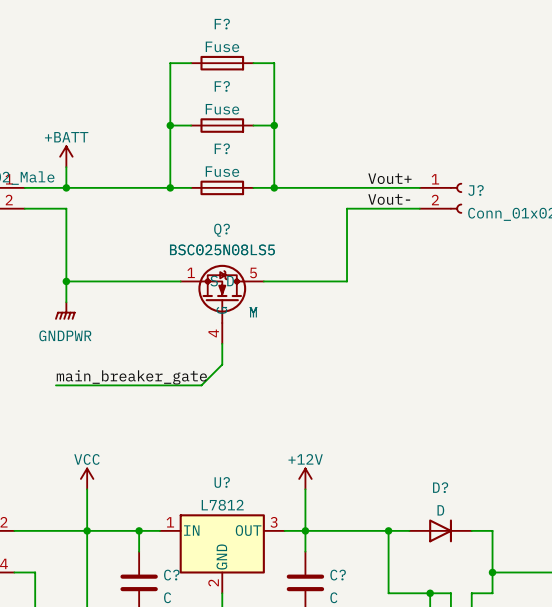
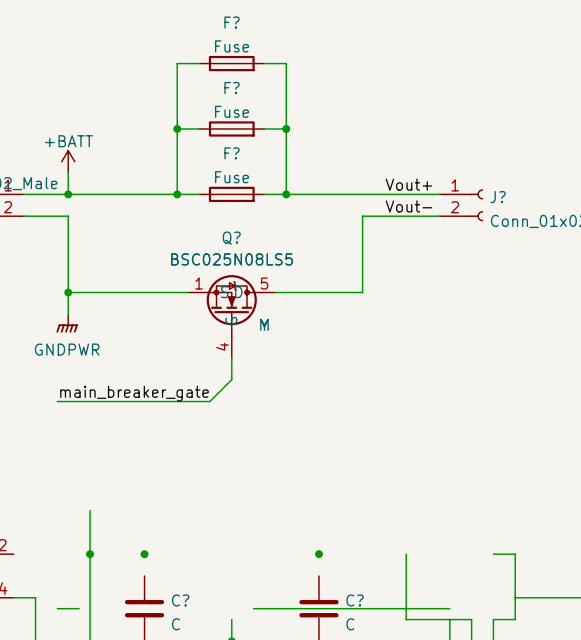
power symbol: VCC (87, 478) -> none
power symbol: +12V (305, 478) -> none
wire: (305, 489) (305, 551) -> none
wire: (14, 530) (159, 530) -> none
wire: (139, 530) (139, 551) -> none
wire: (284, 530) (409, 530) -> none
junction: (388, 530) -> none
D?: D (440, 530) -> none
U?: L7812 (222, 553) -> none
junction: (492, 572) -> none
wire: none -> (57, 608) (79, 608)
wire: none -> (253, 608) (449, 608)
junction: (430, 593) -> none

